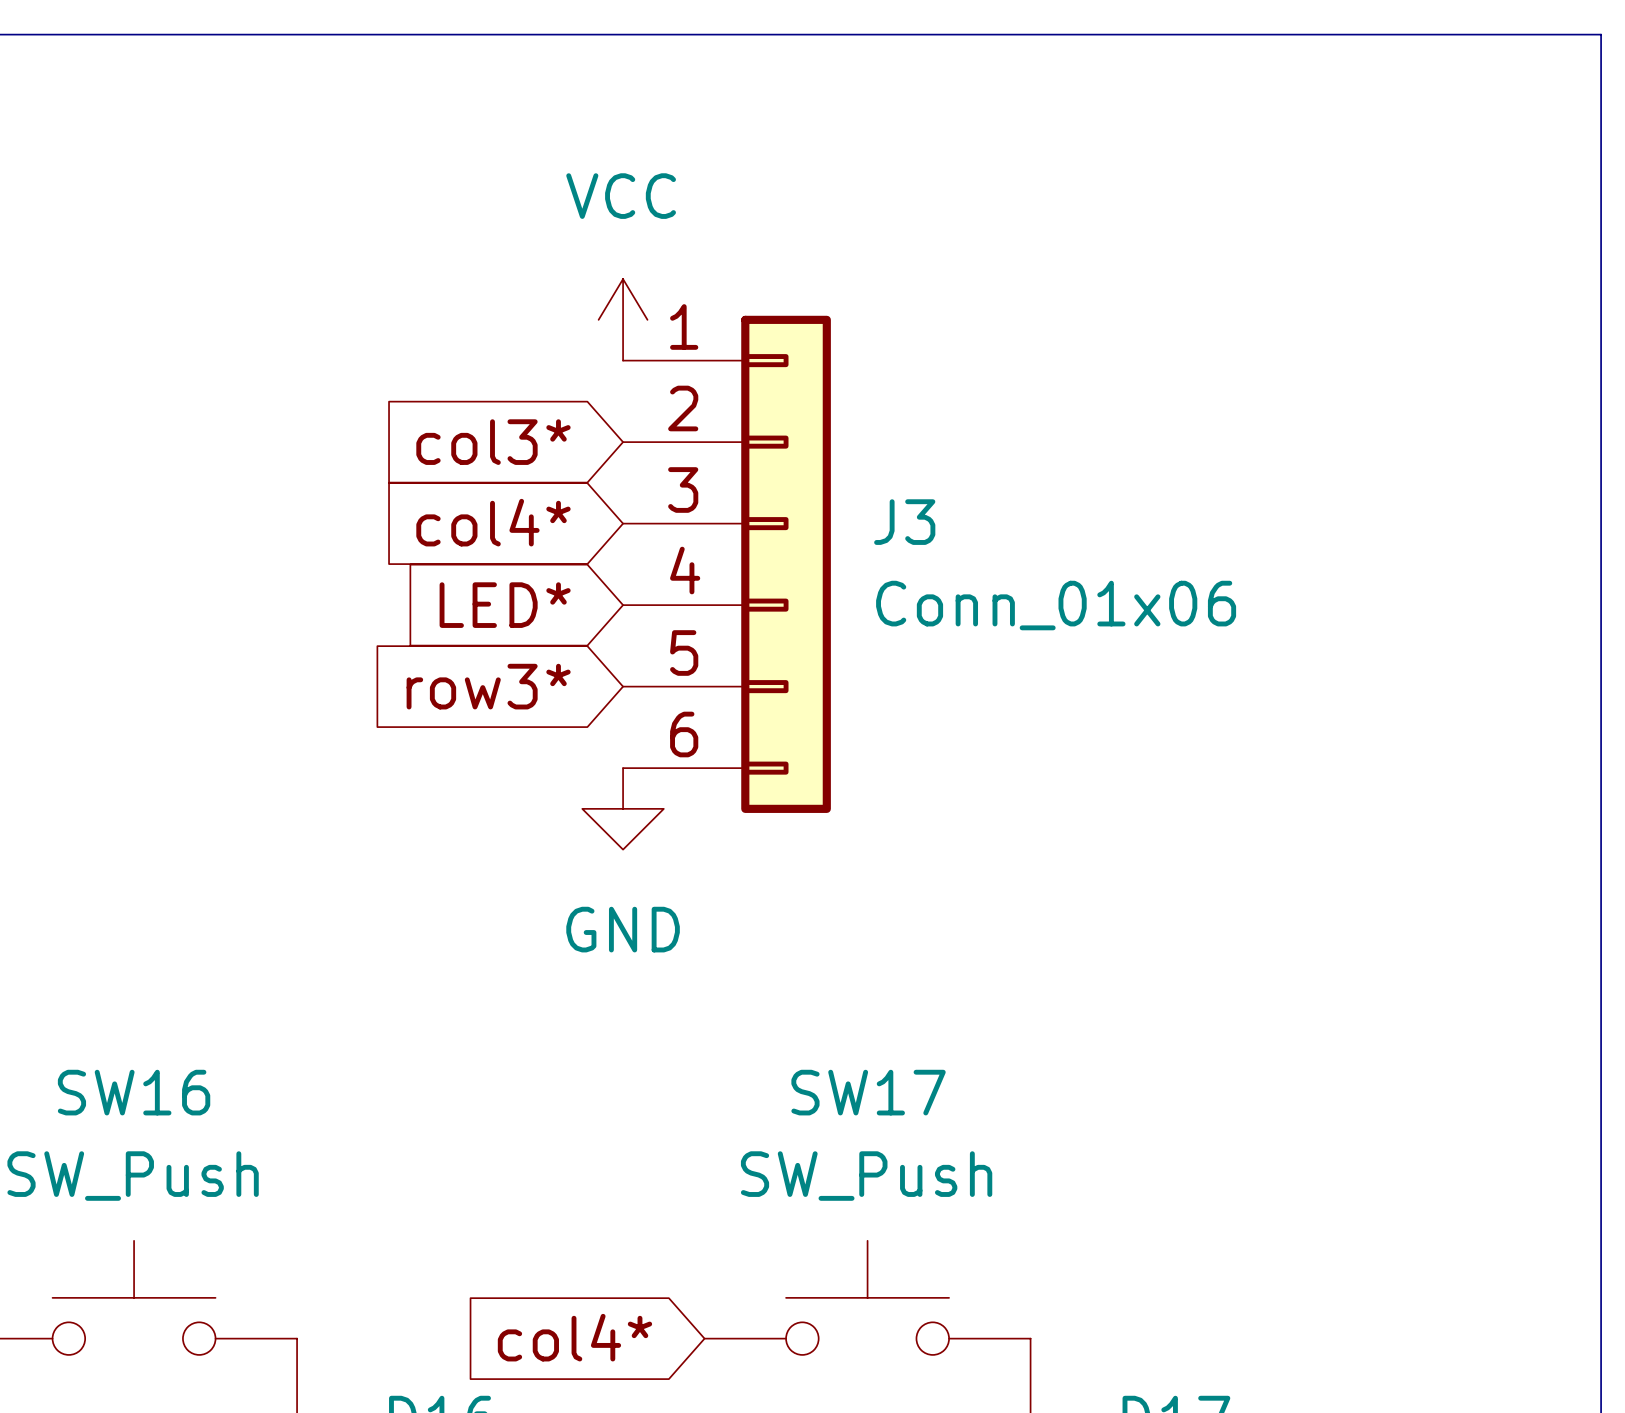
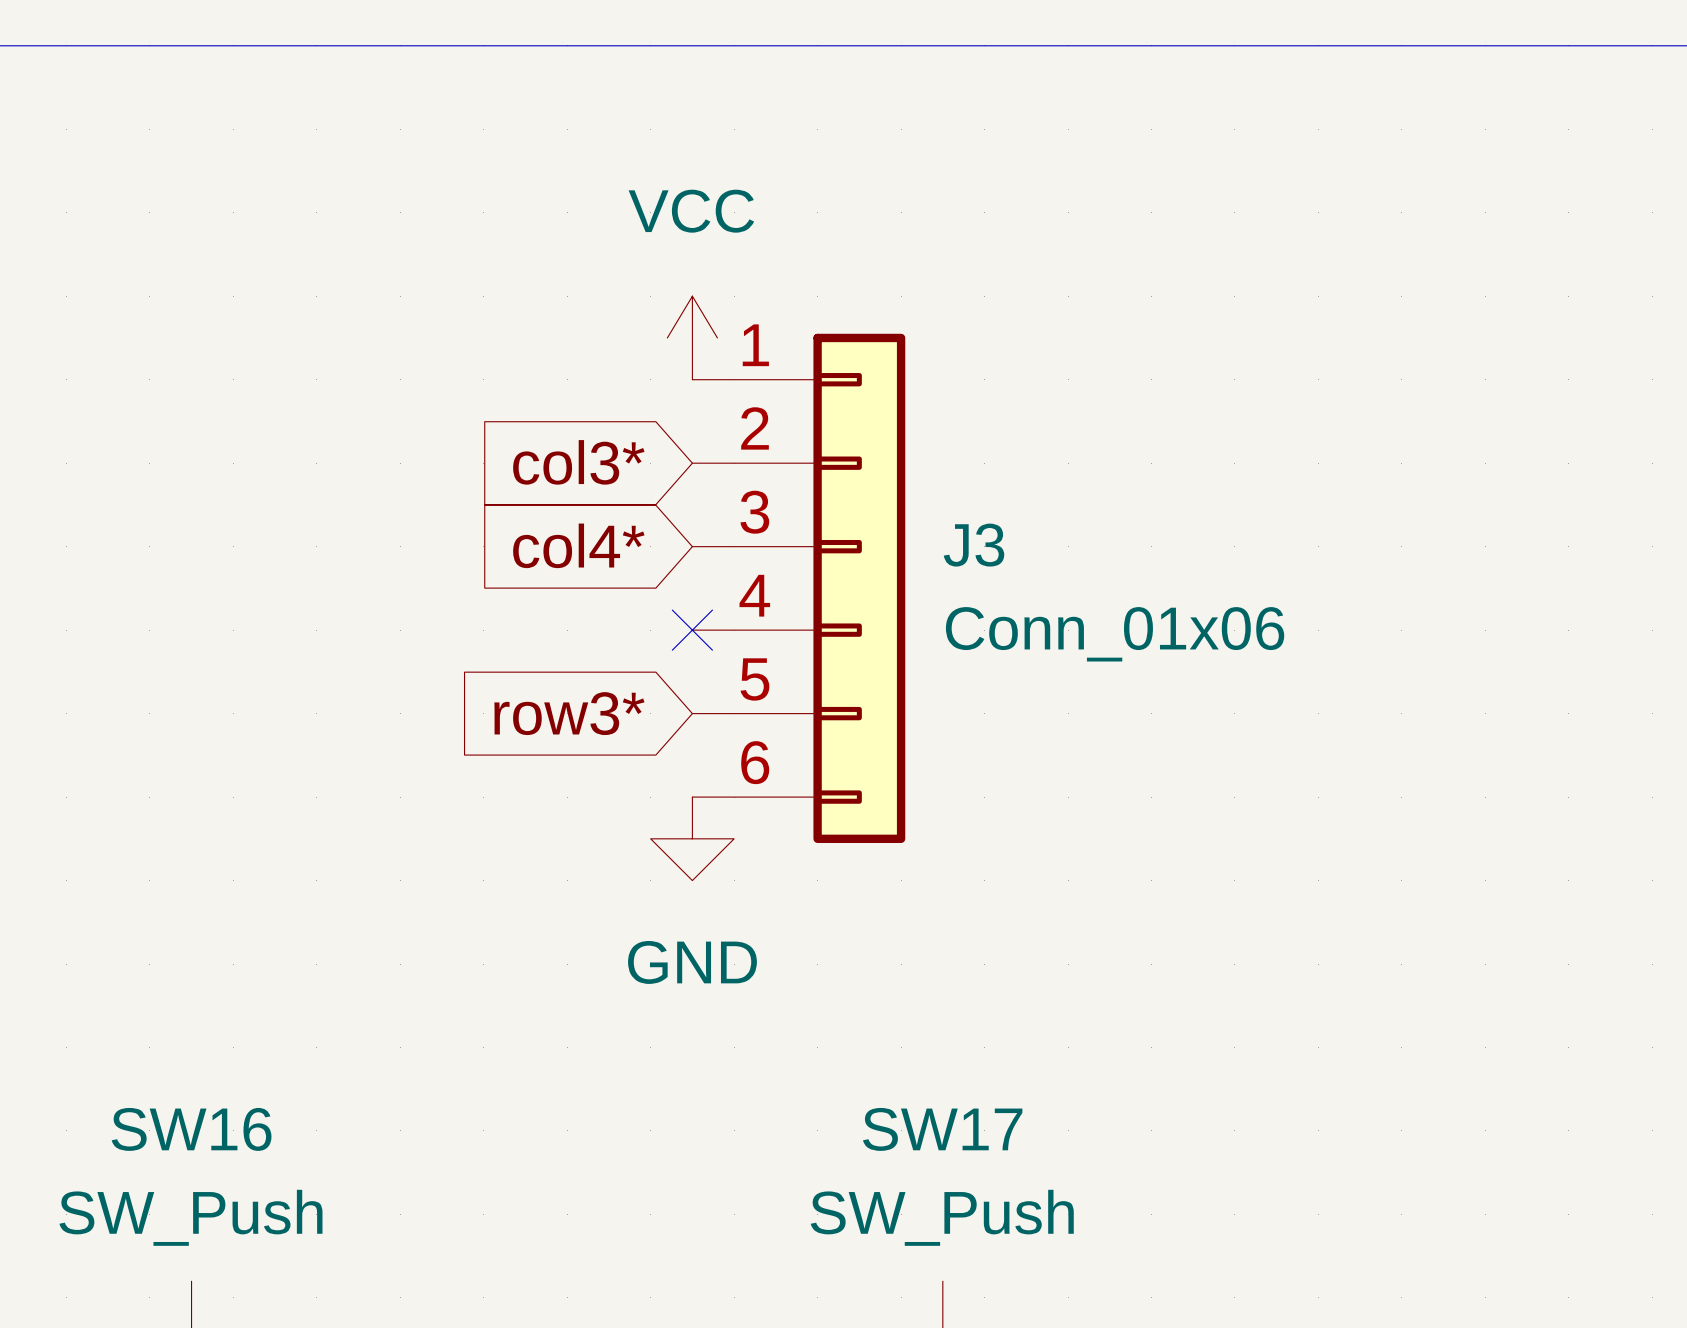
global label: LED* (505, 605) -> none
no-connect mark: none -> (692, 630)

